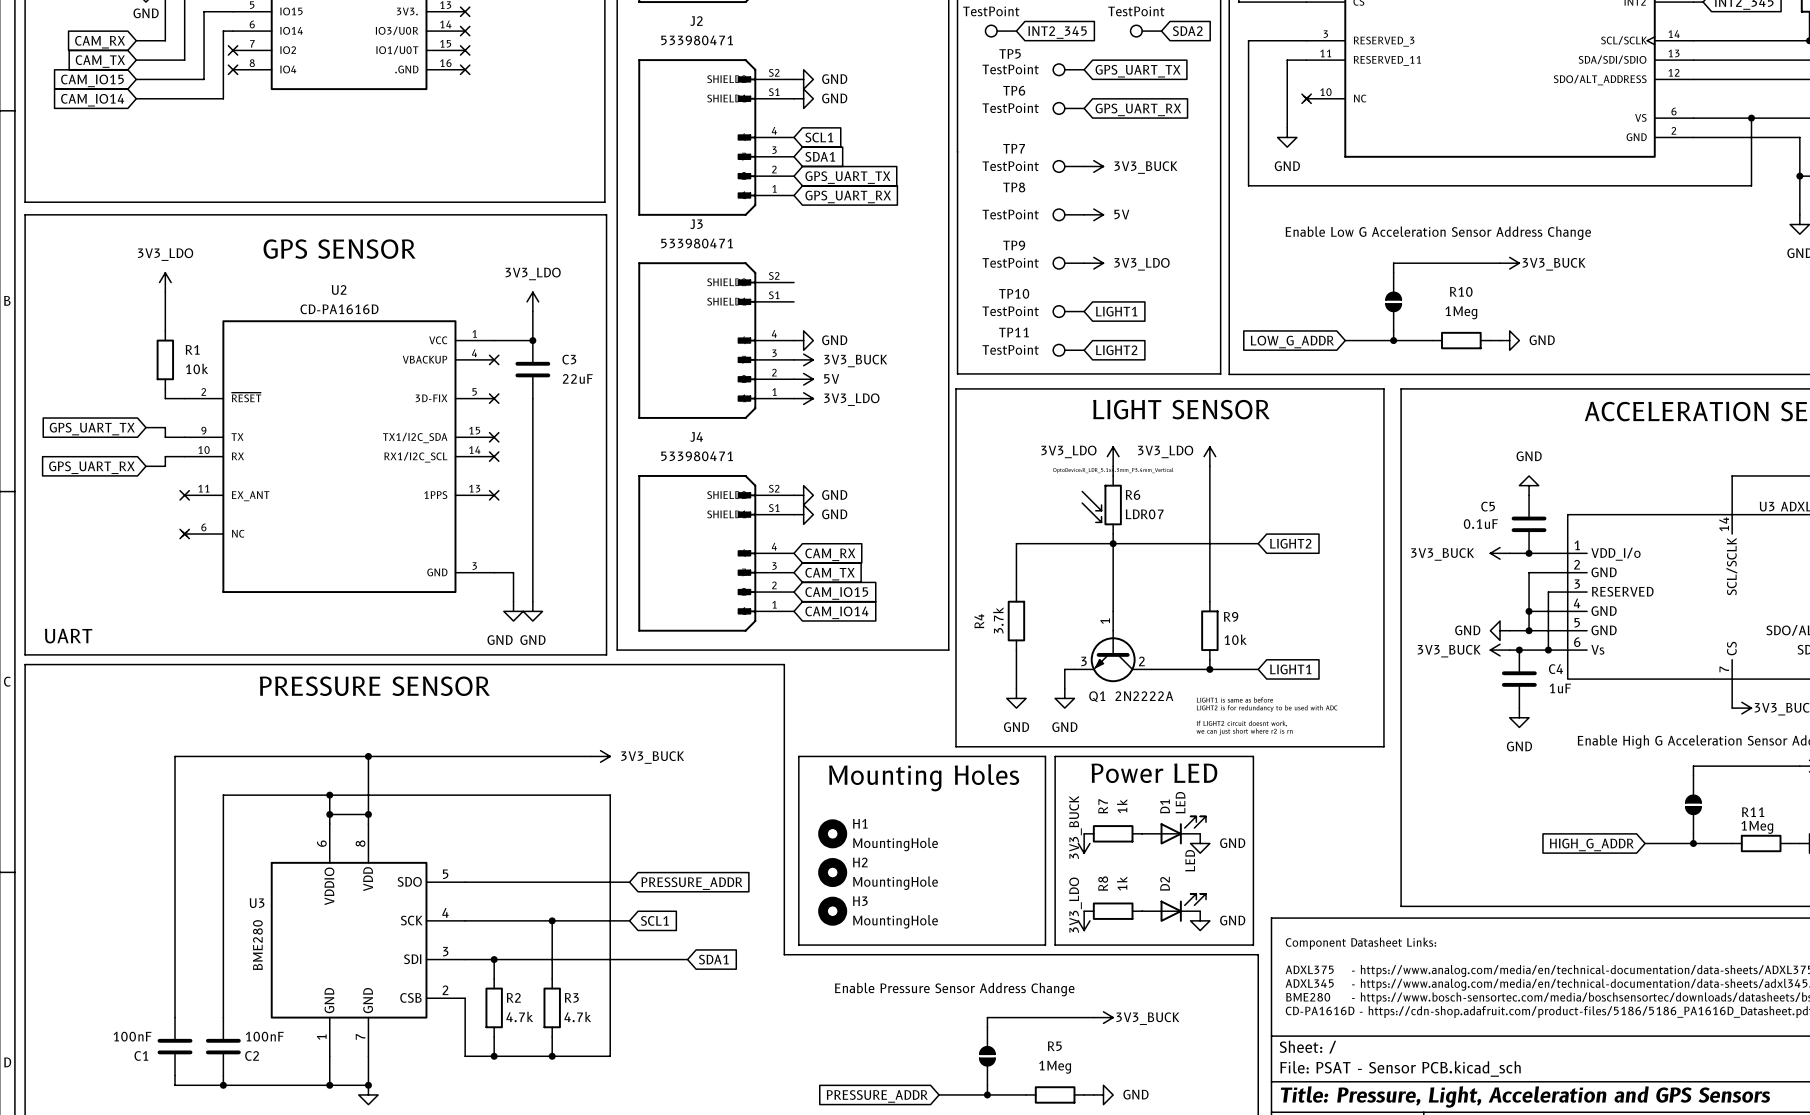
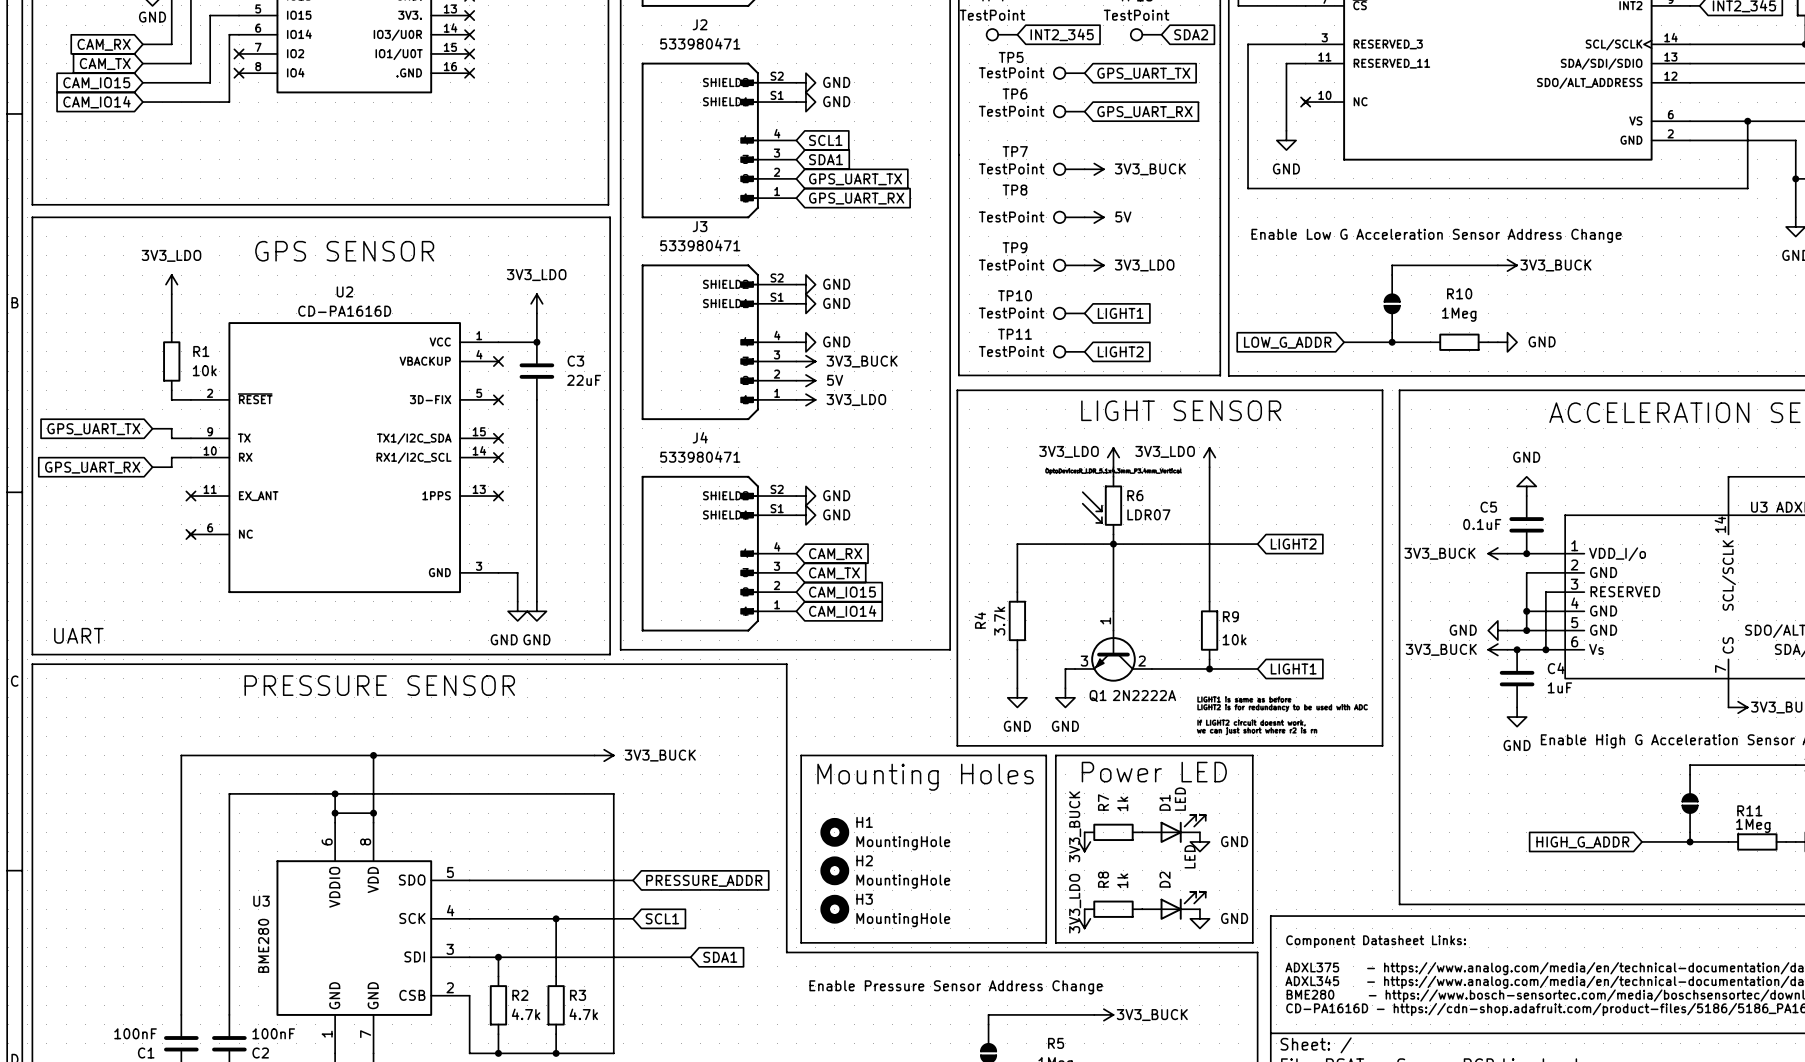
power symbol: none -> GND (805, 284)
power symbol: none -> GND (805, 303)

